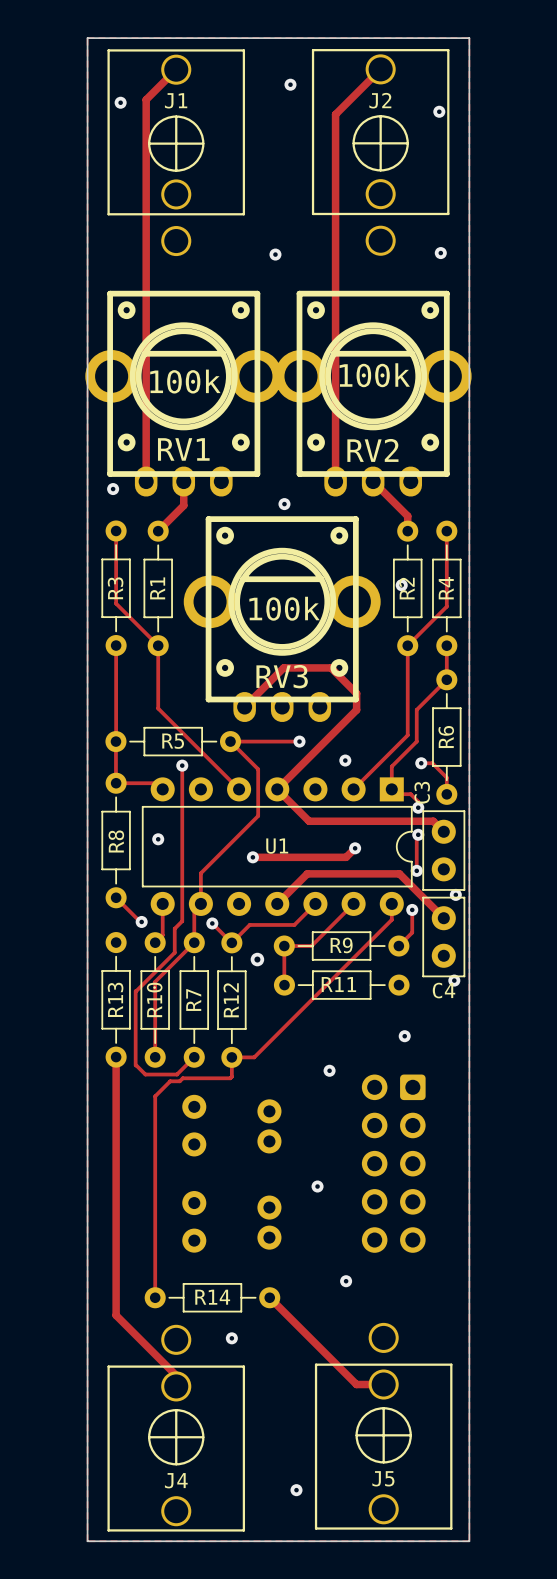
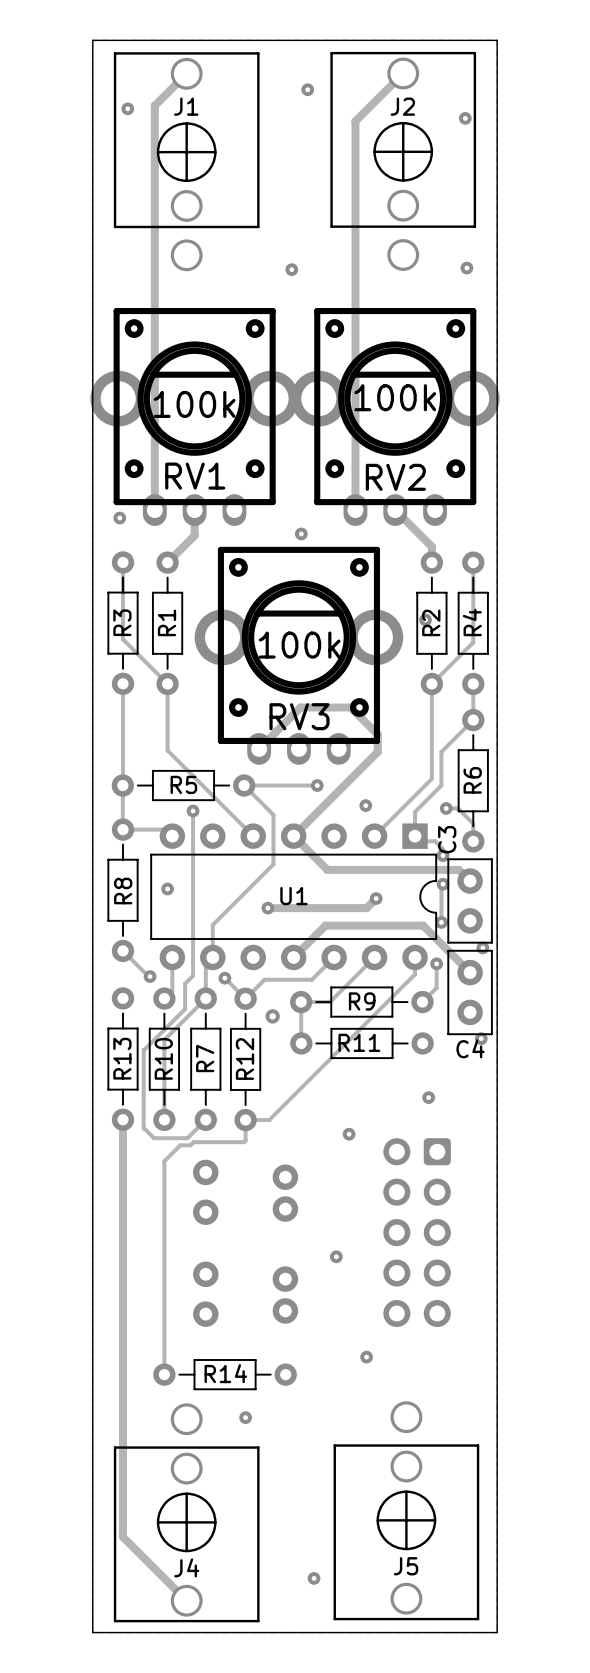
track: (269, 1297) (356, 1384) (383, 1384) -> none
track: (116, 1315) (179, 1378) -> (123, 1393) (123, 1537) (186, 1600)

